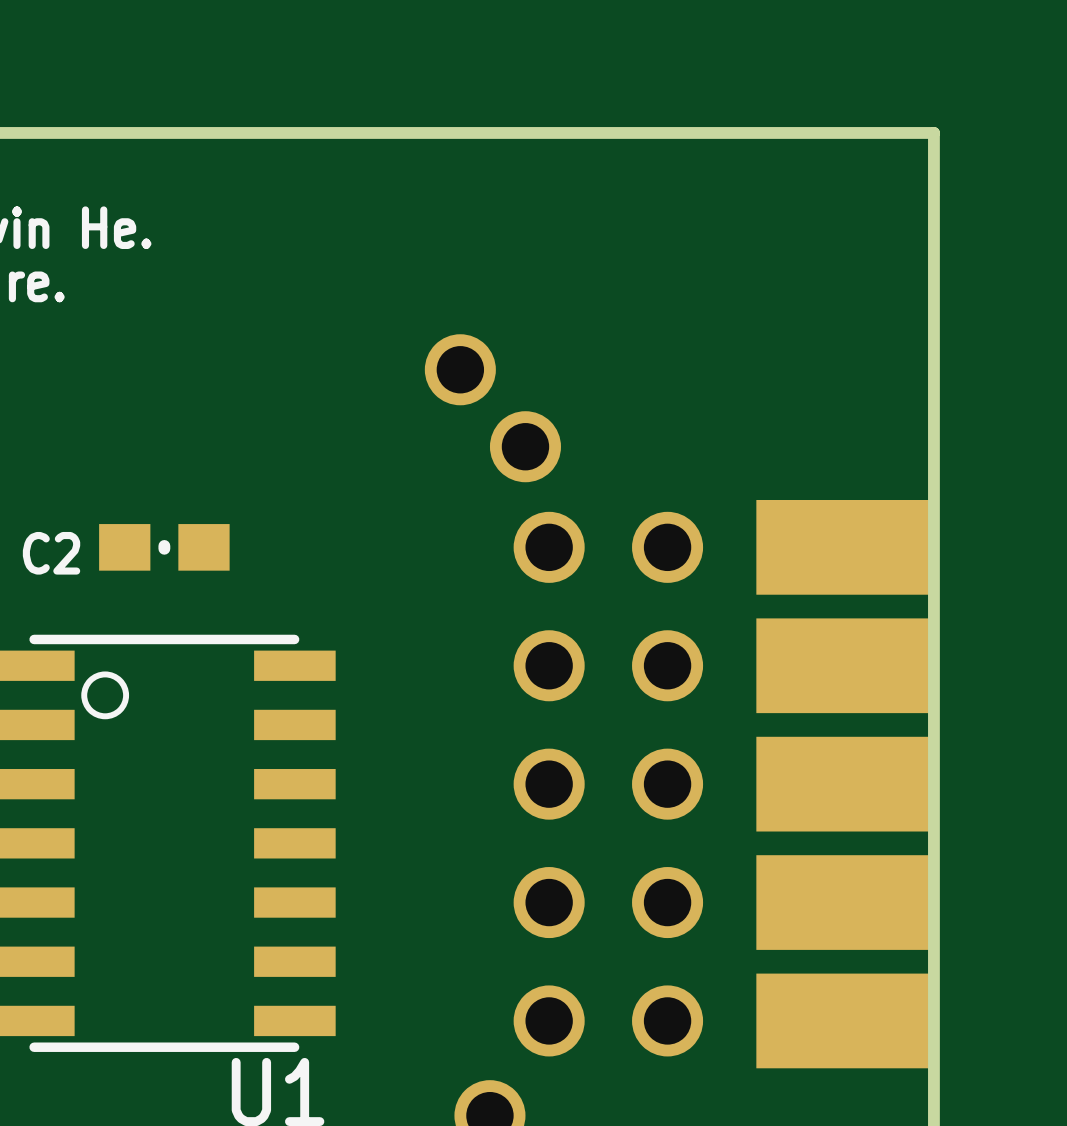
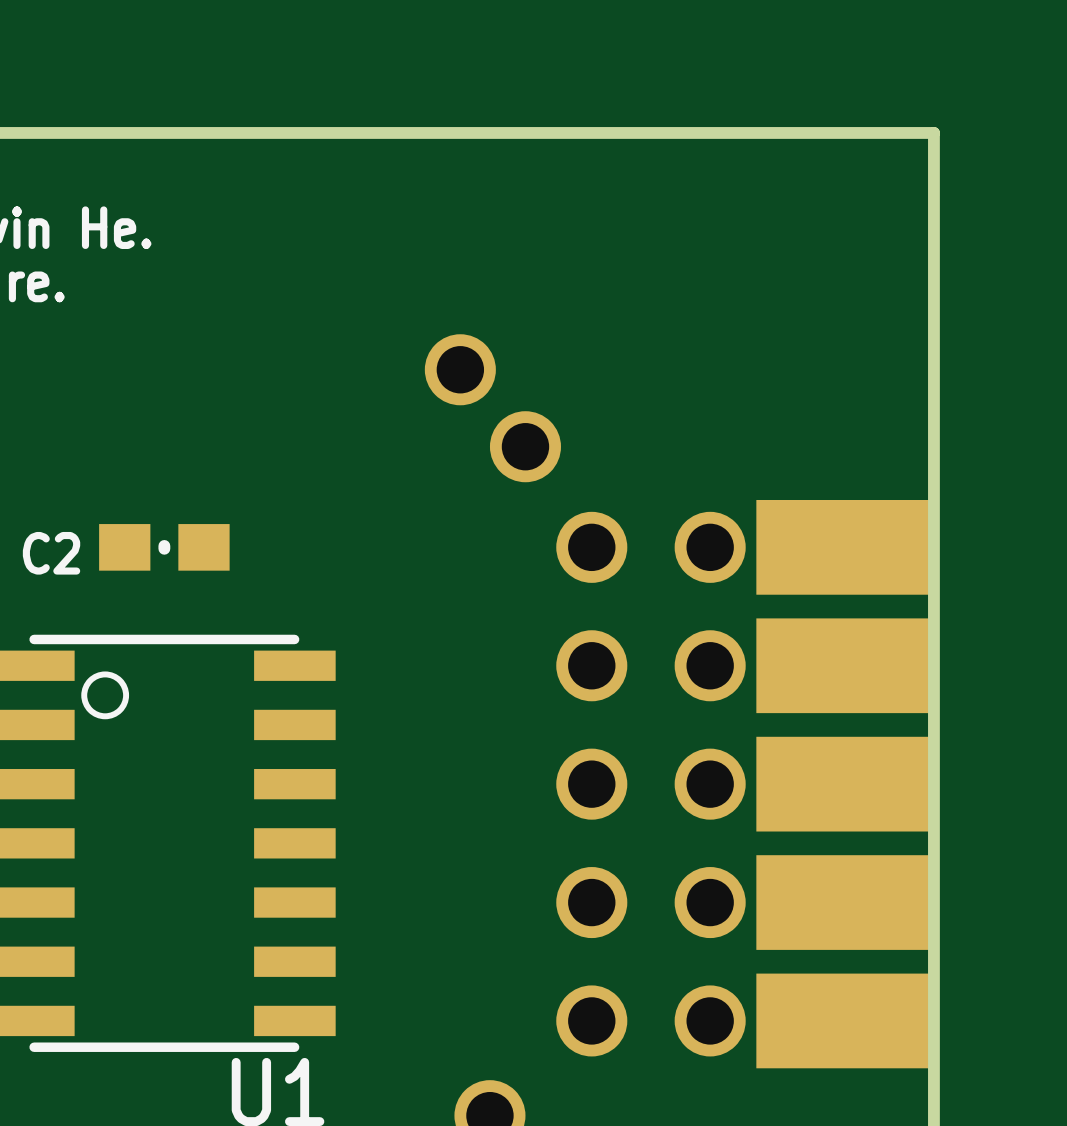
part position: (608, 784) -> (650, 784)

